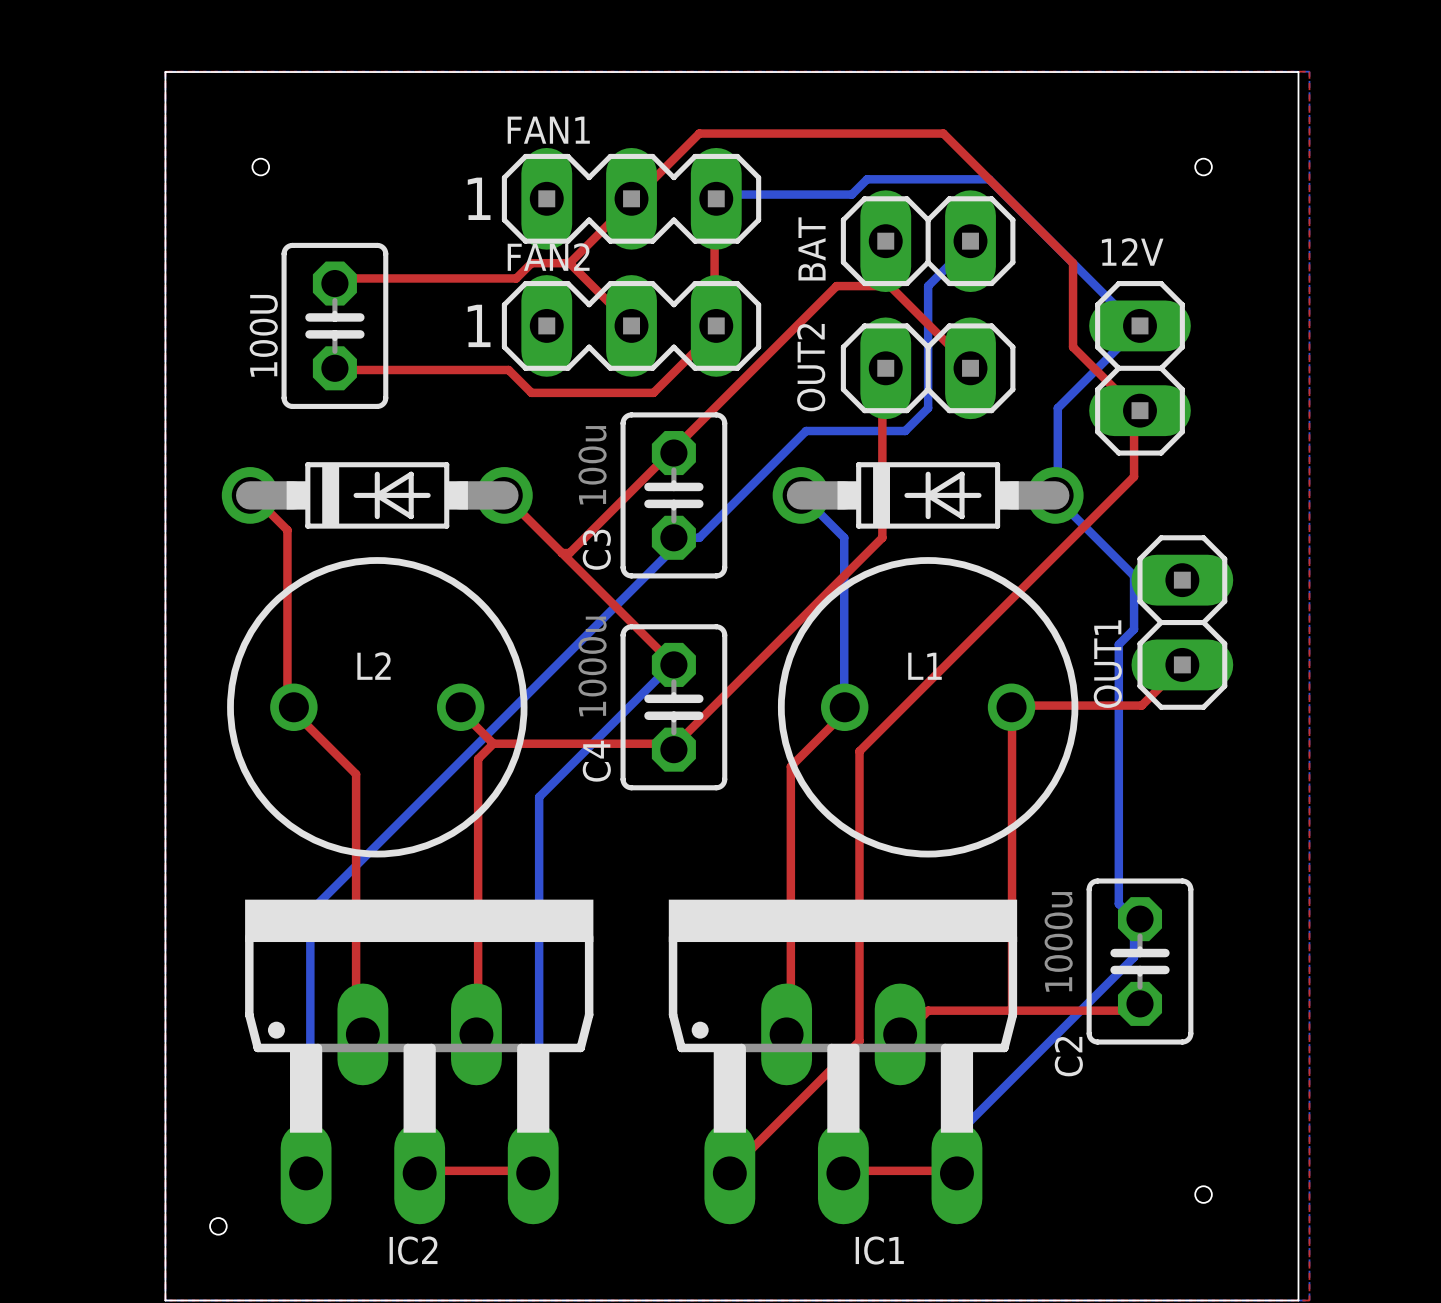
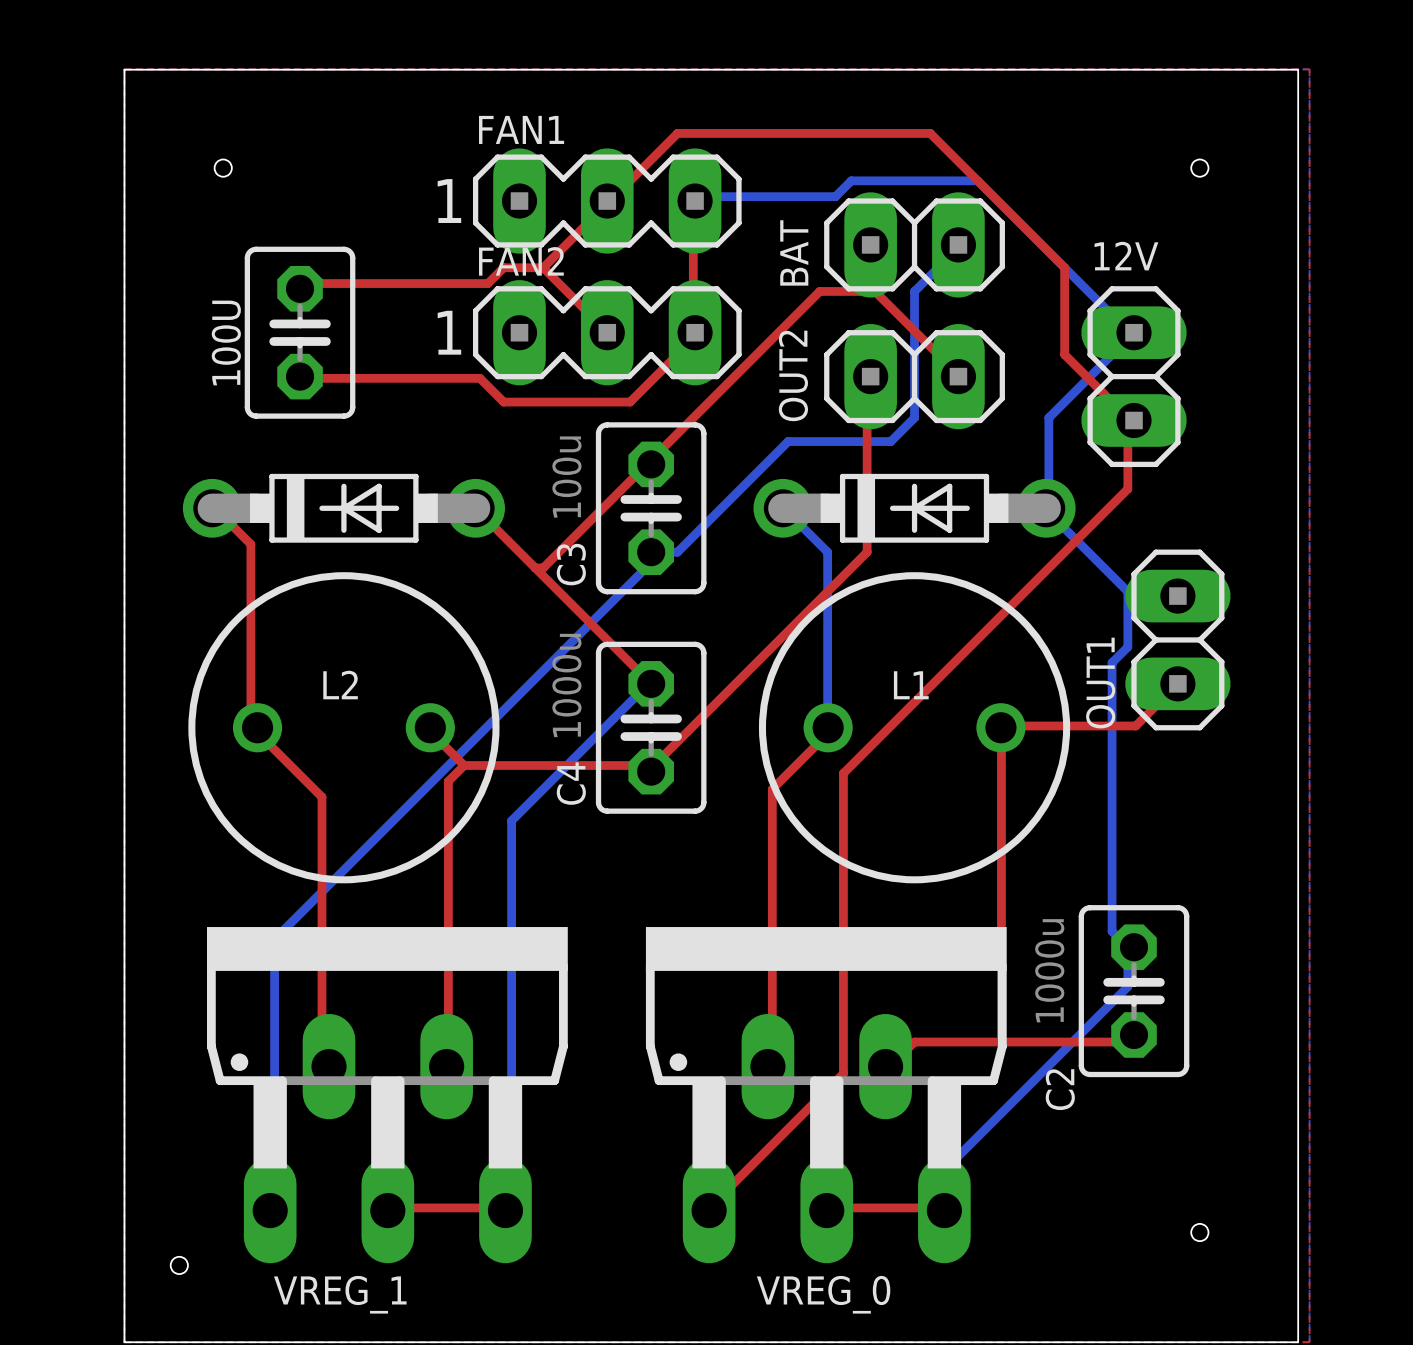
IC2 name: IC2 (413, 1250) -> VREG_1 (340, 1294)
IC1 name: IC1 (879, 1250) -> VREG_0 (823, 1294)

